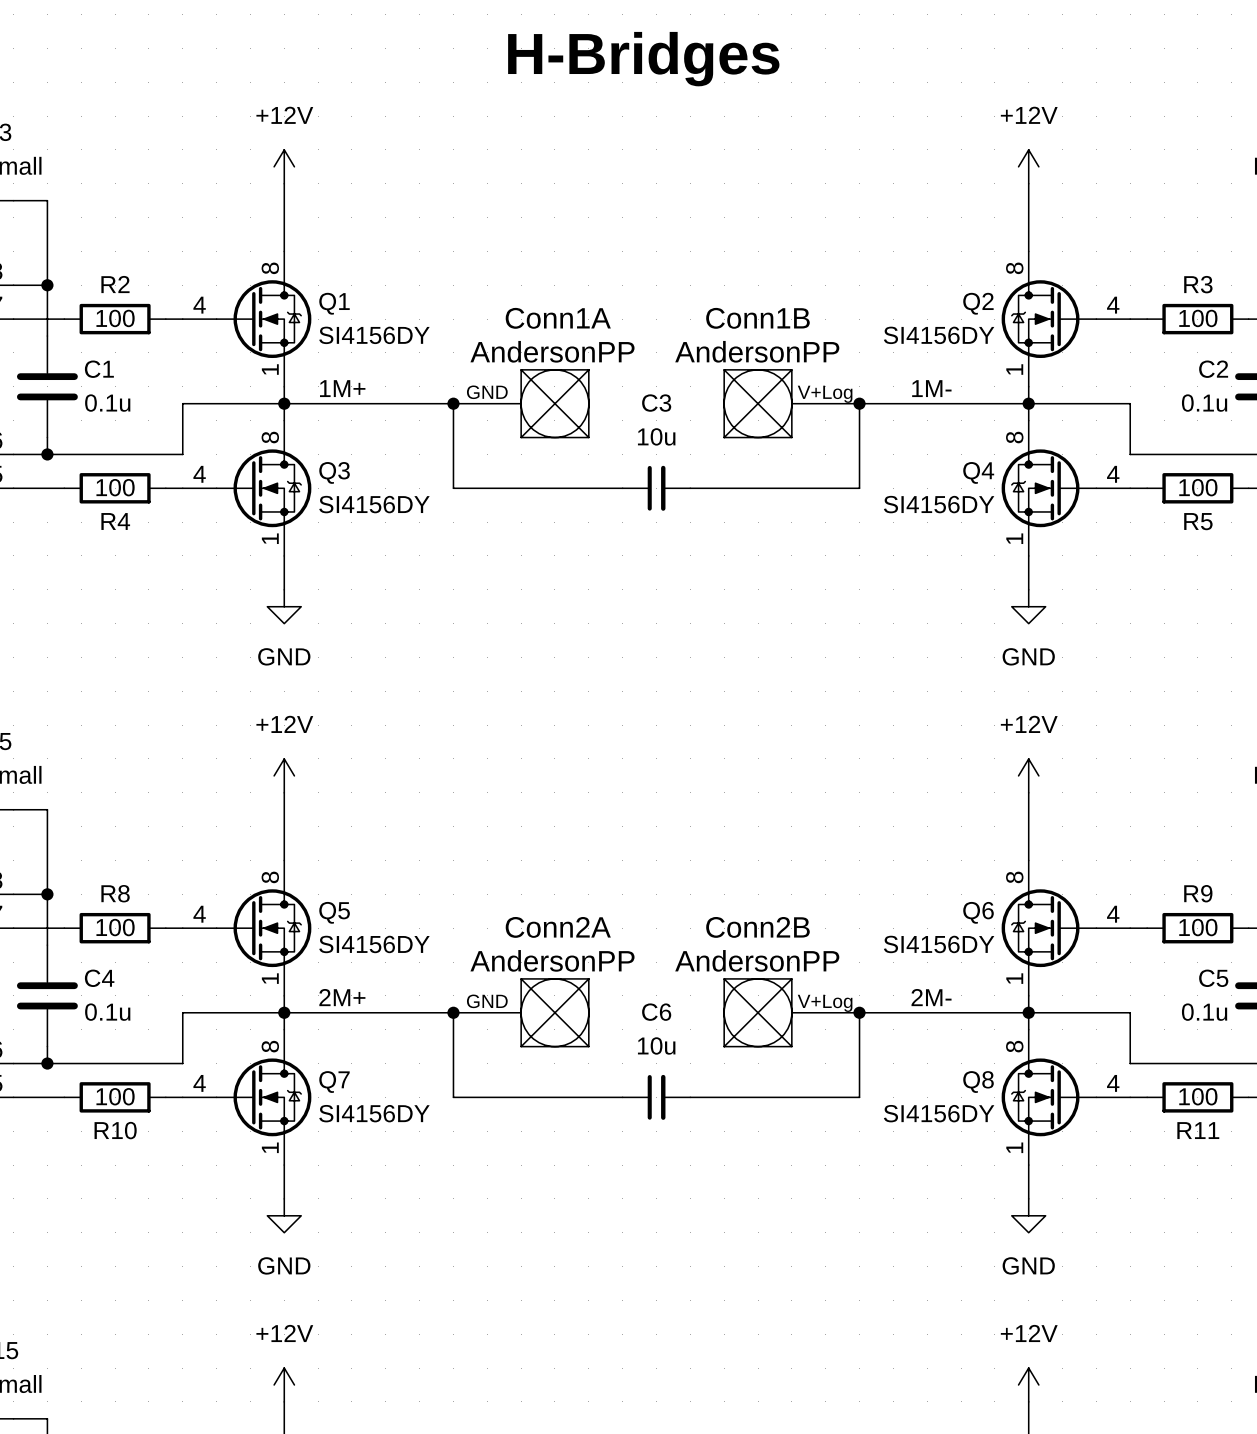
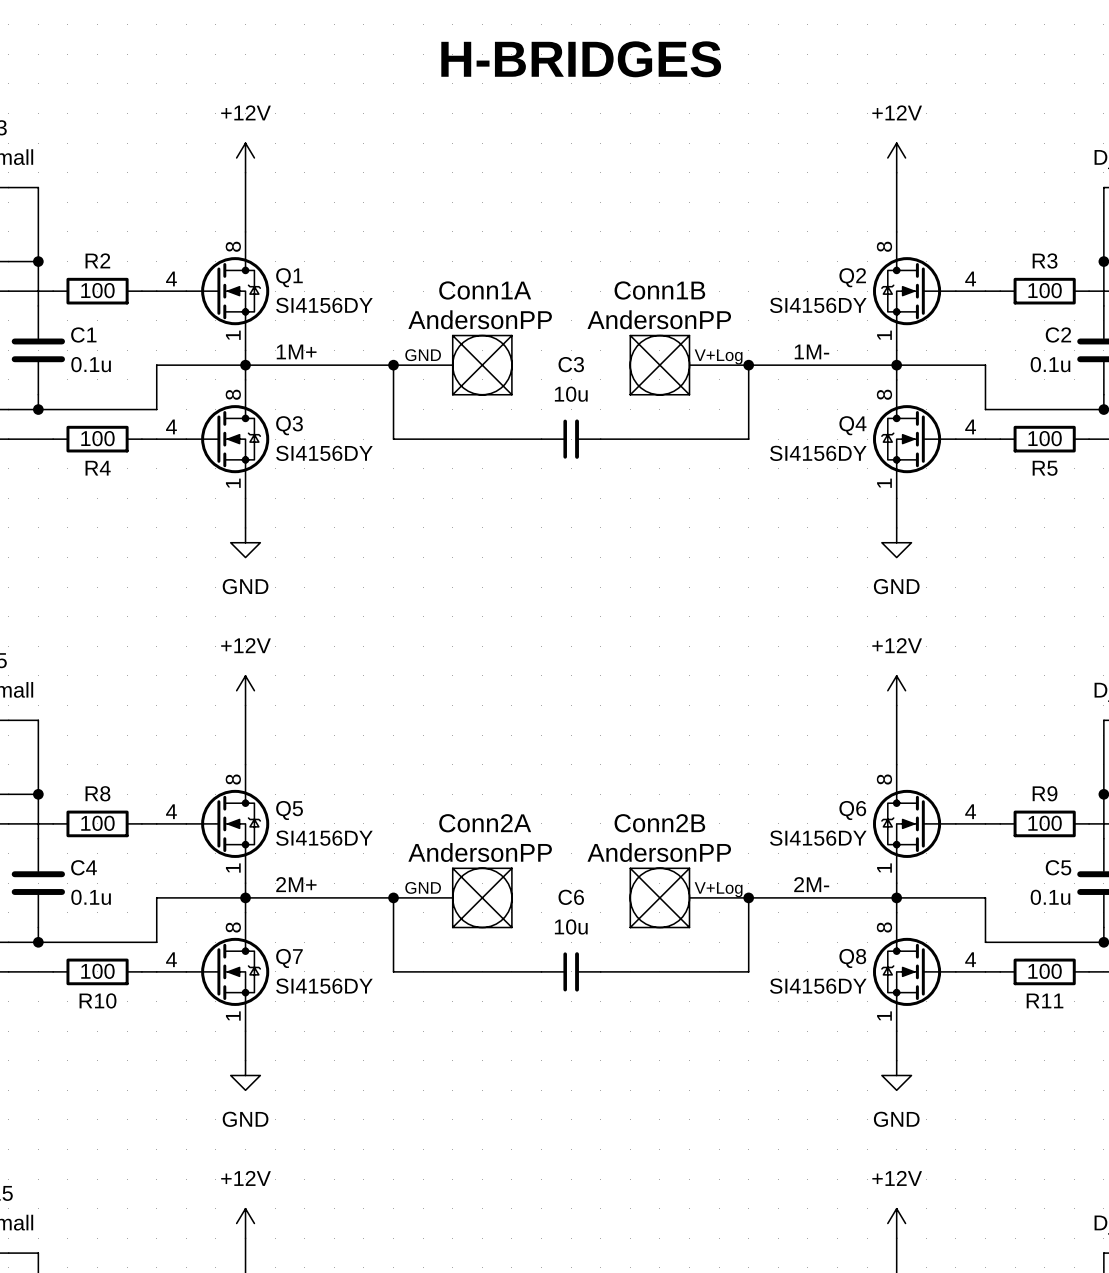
text: H-Bridges (643, 59) -> H-BRIDGES (581, 59)

